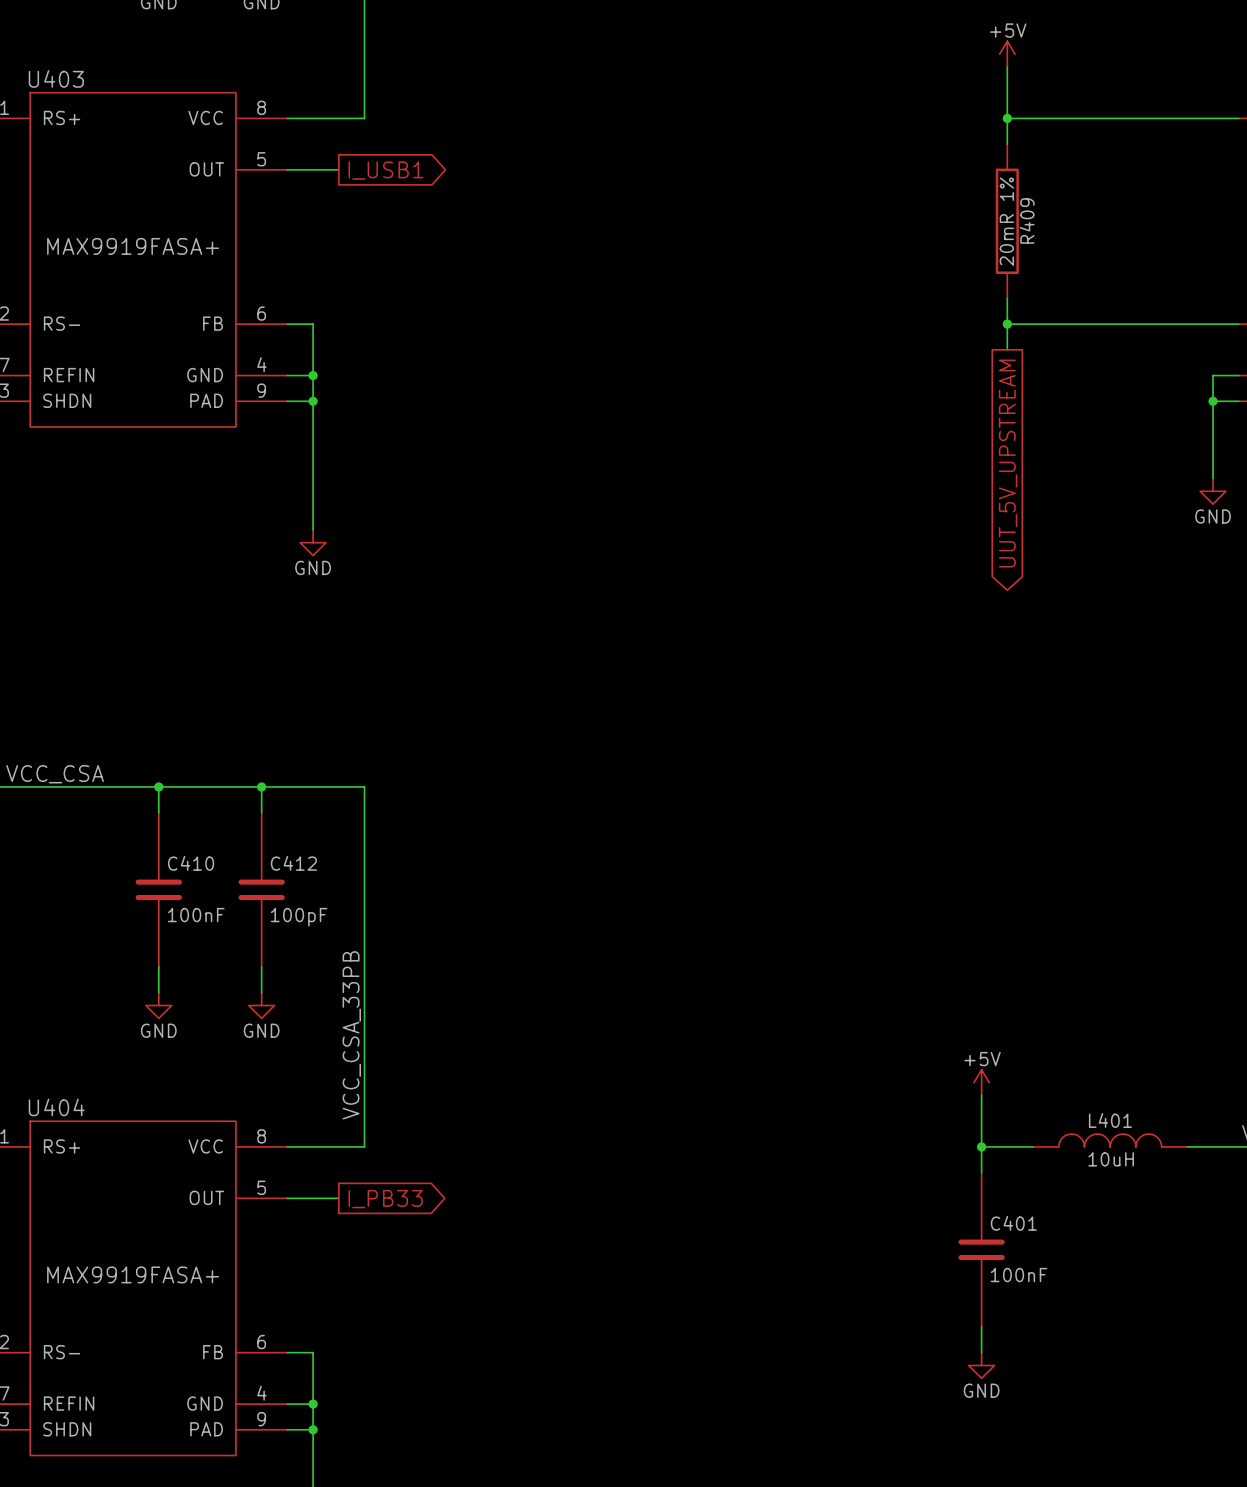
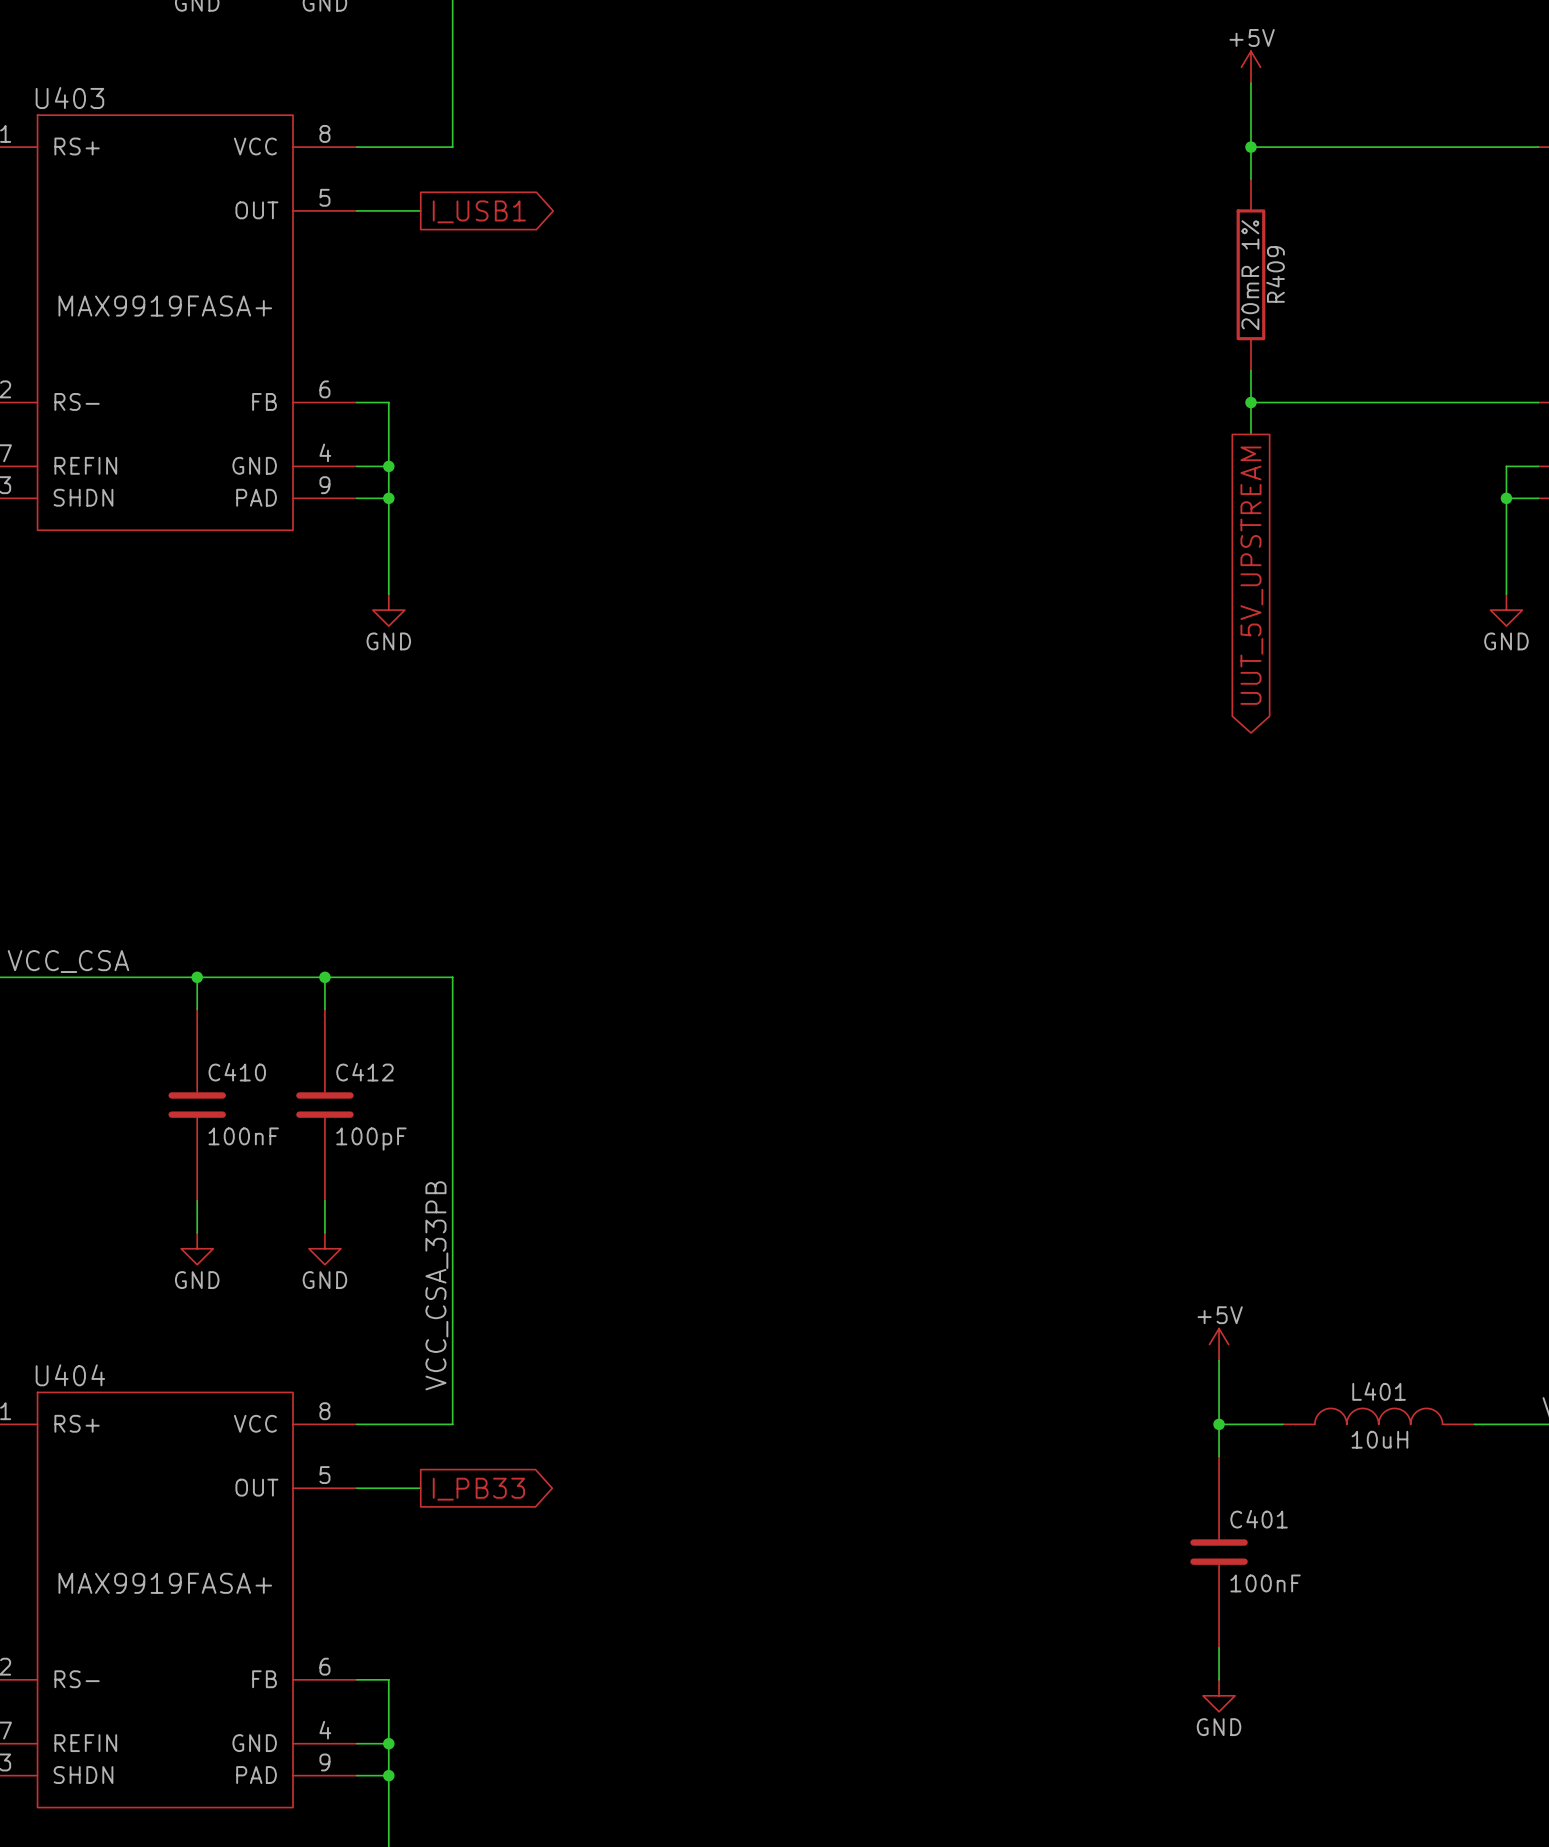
wire: (313, 478) (313, 529) -> none
power symbol position: GND (313, 542) -> GND (388, 610)

